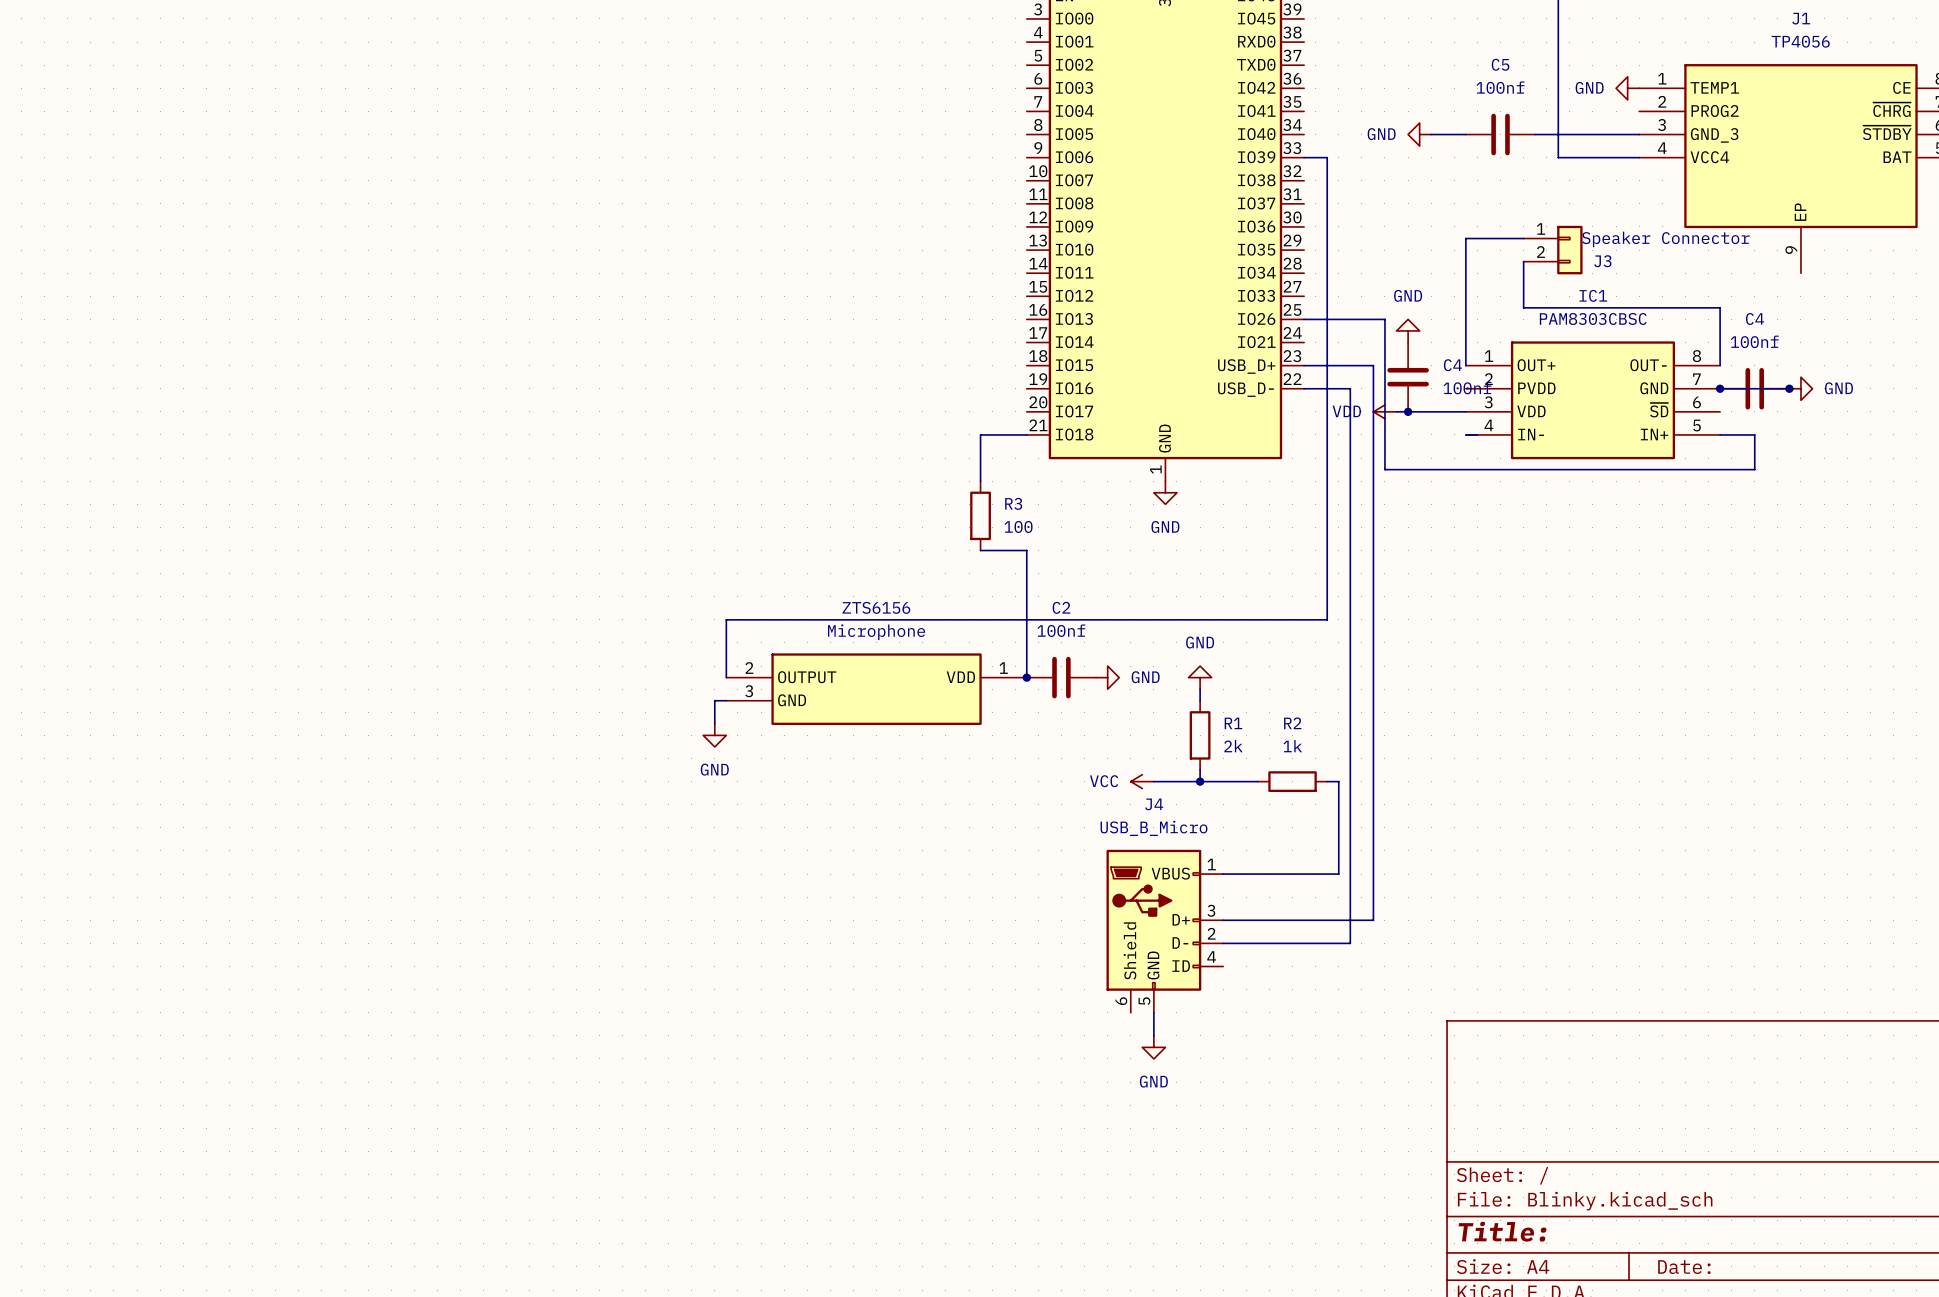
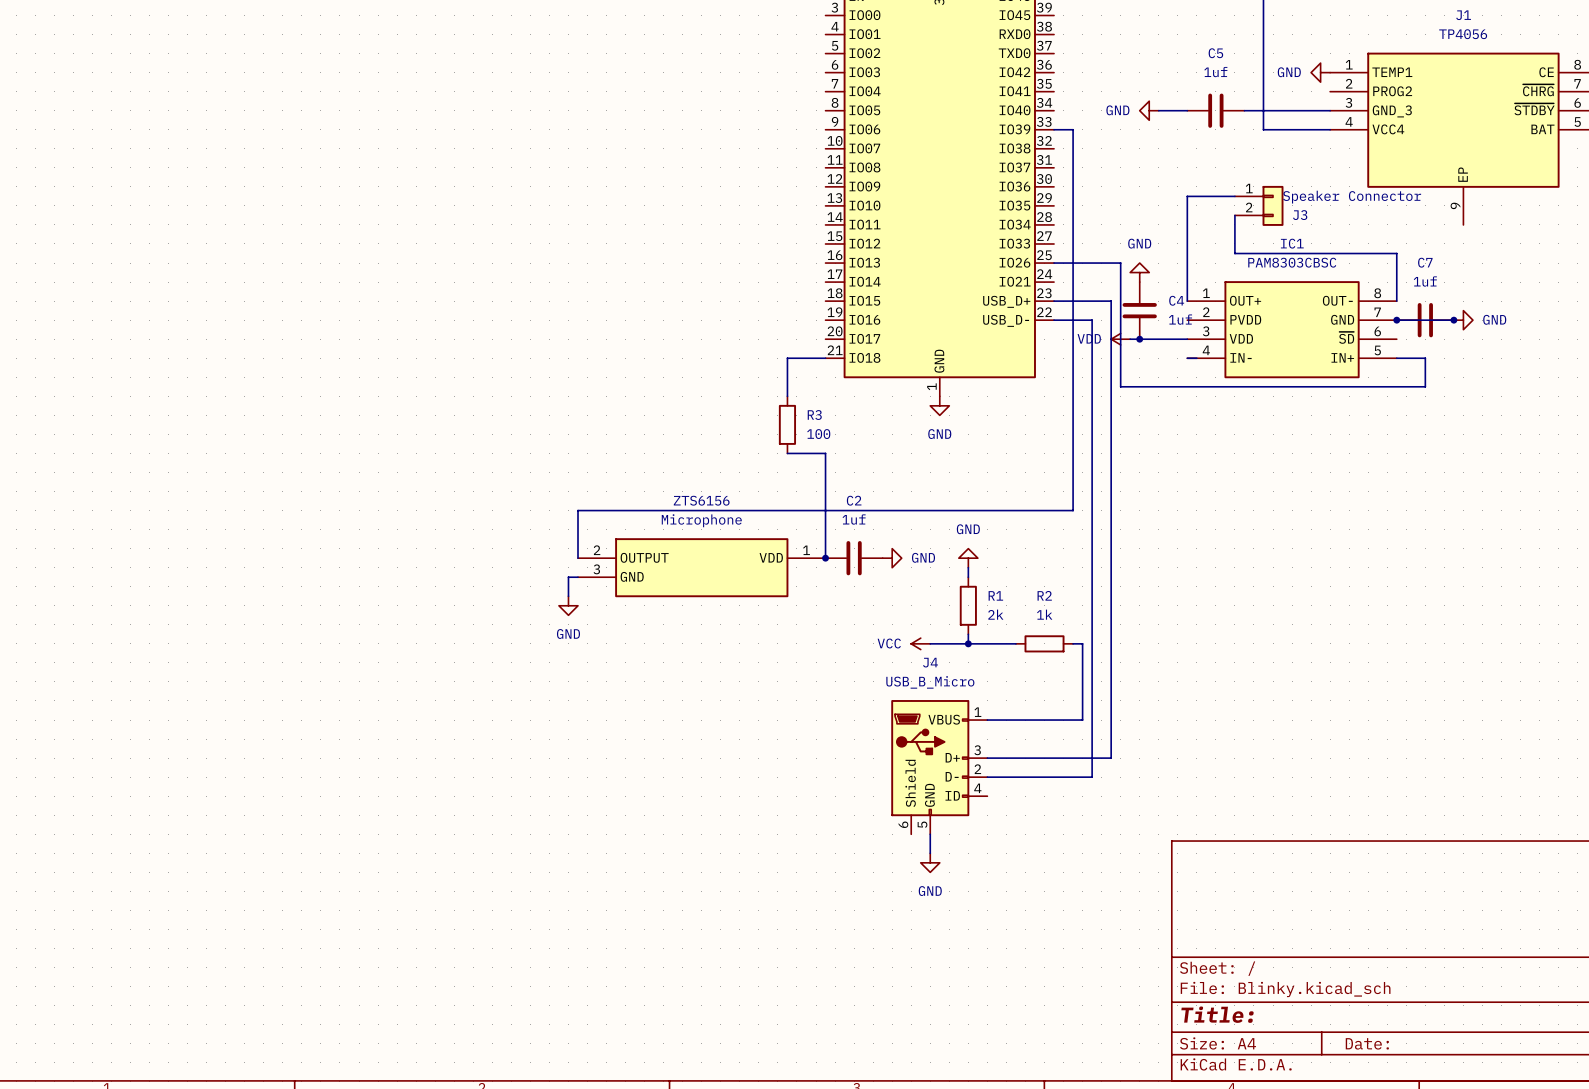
C5 value: 100nf (1500, 87) -> 1uf (1215, 72)
C4 name: C4 (1755, 318) -> C7 (1425, 262)
C4 value: 100nf (1754, 341) -> 1uf (1425, 281)
C4 value: 100nf (1467, 388) -> 1uf (1180, 319)
C2 value: 100nf (1061, 630) -> 1uf (854, 519)

